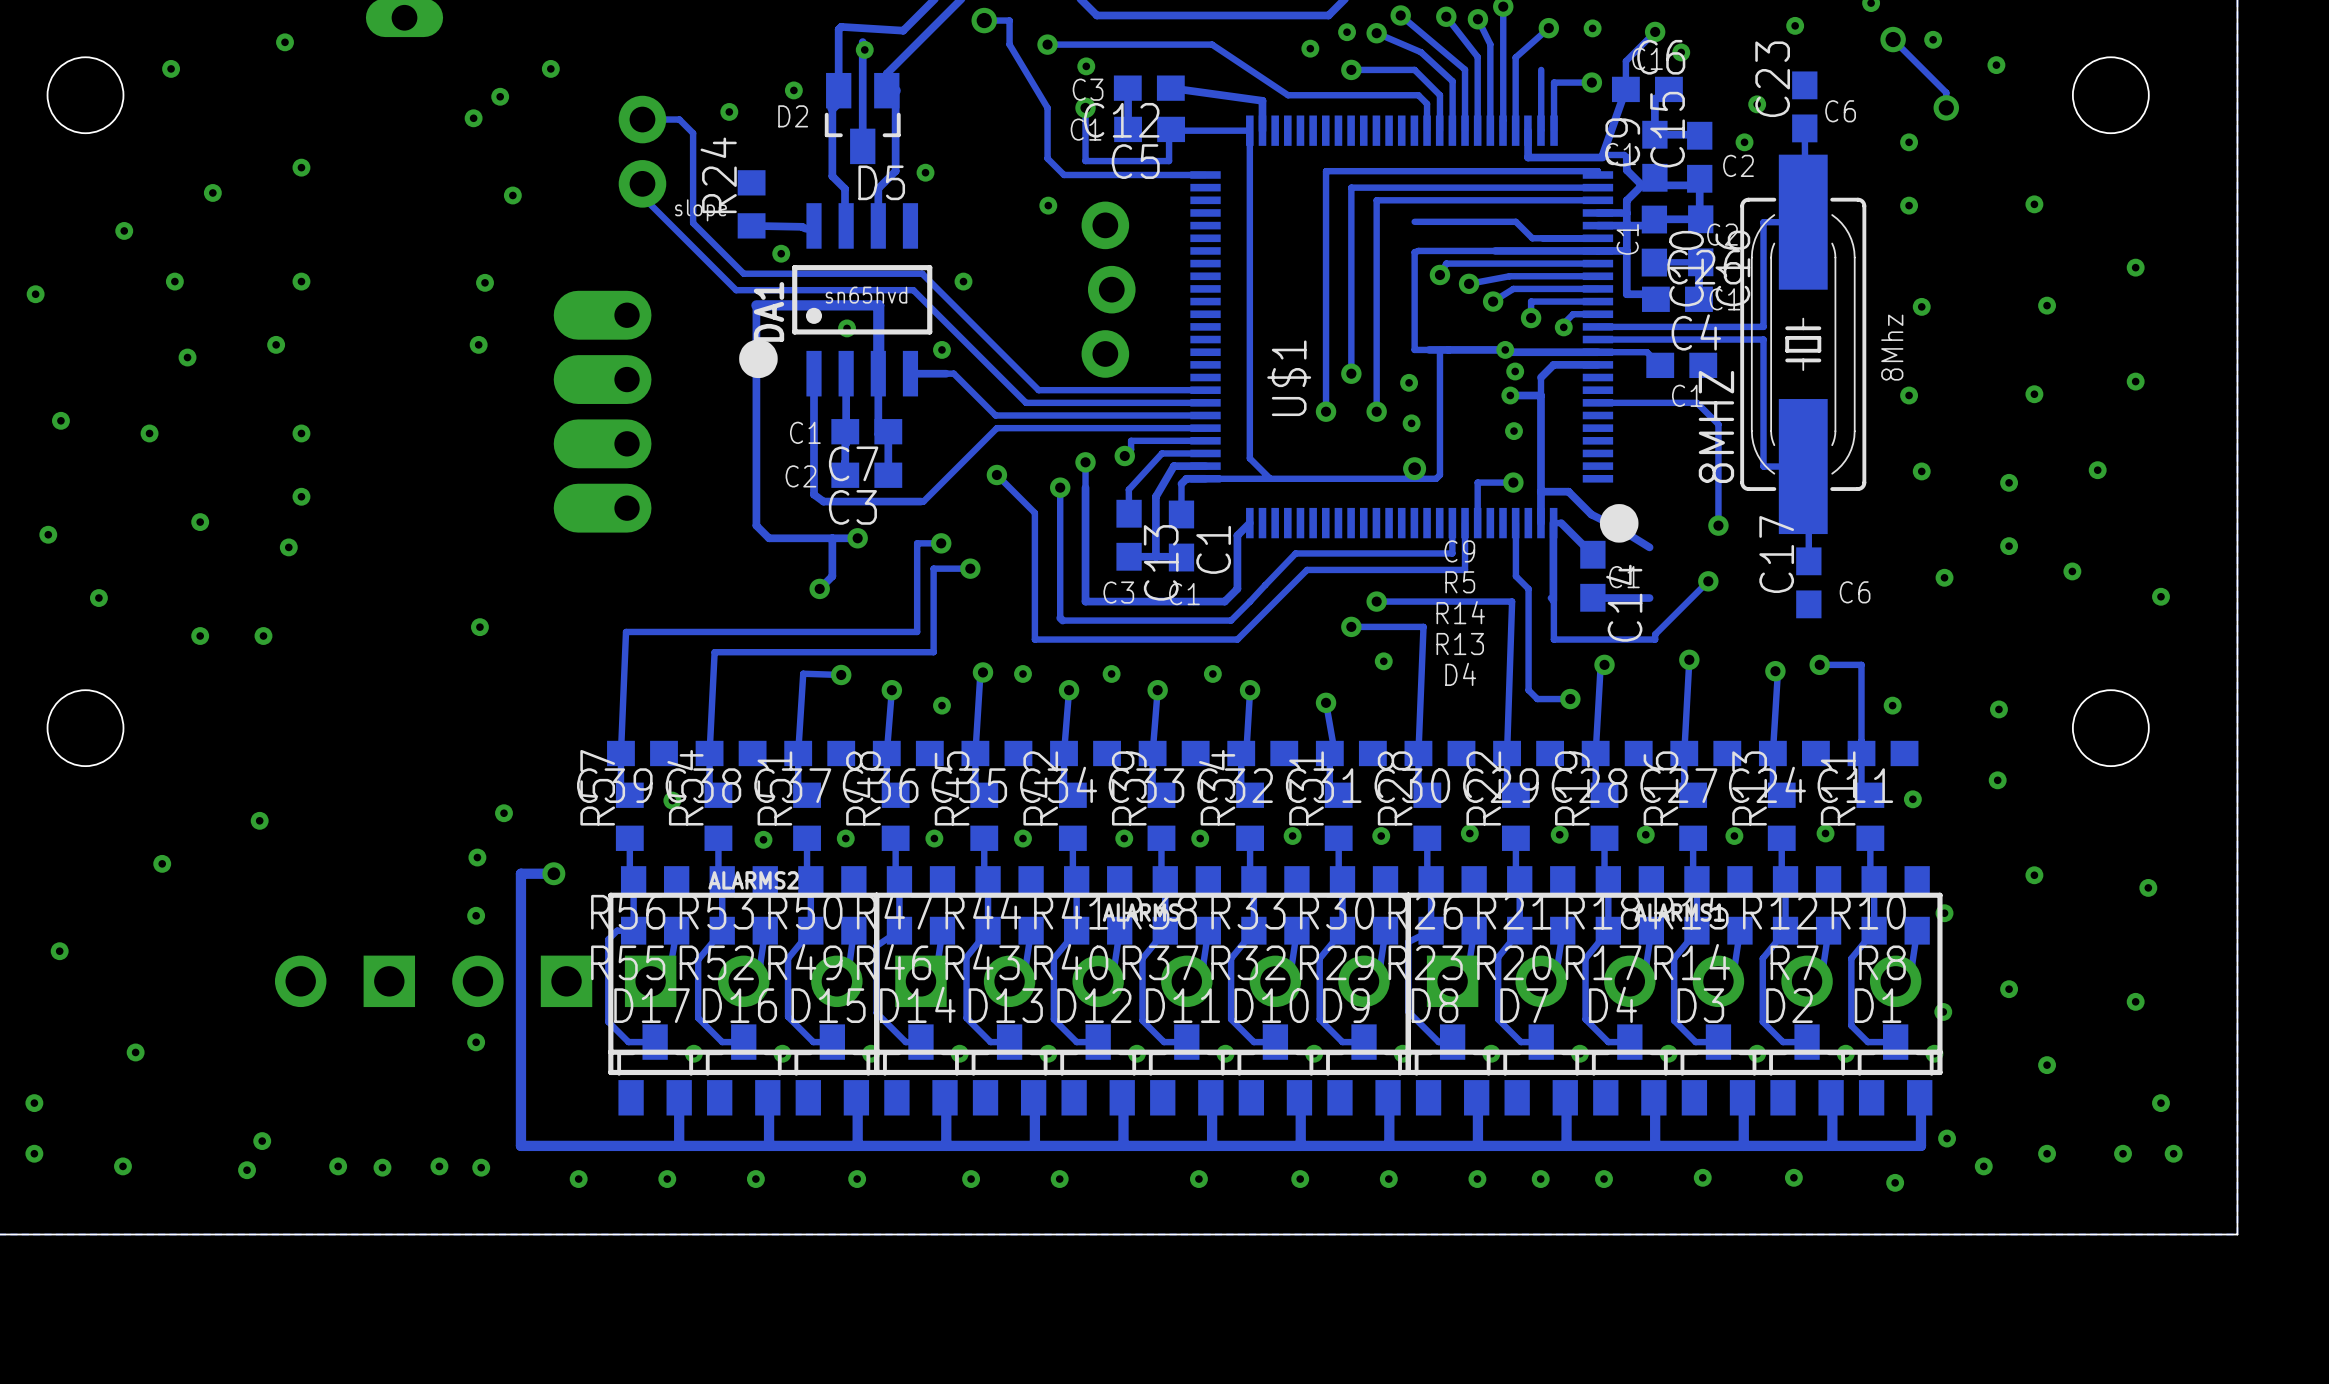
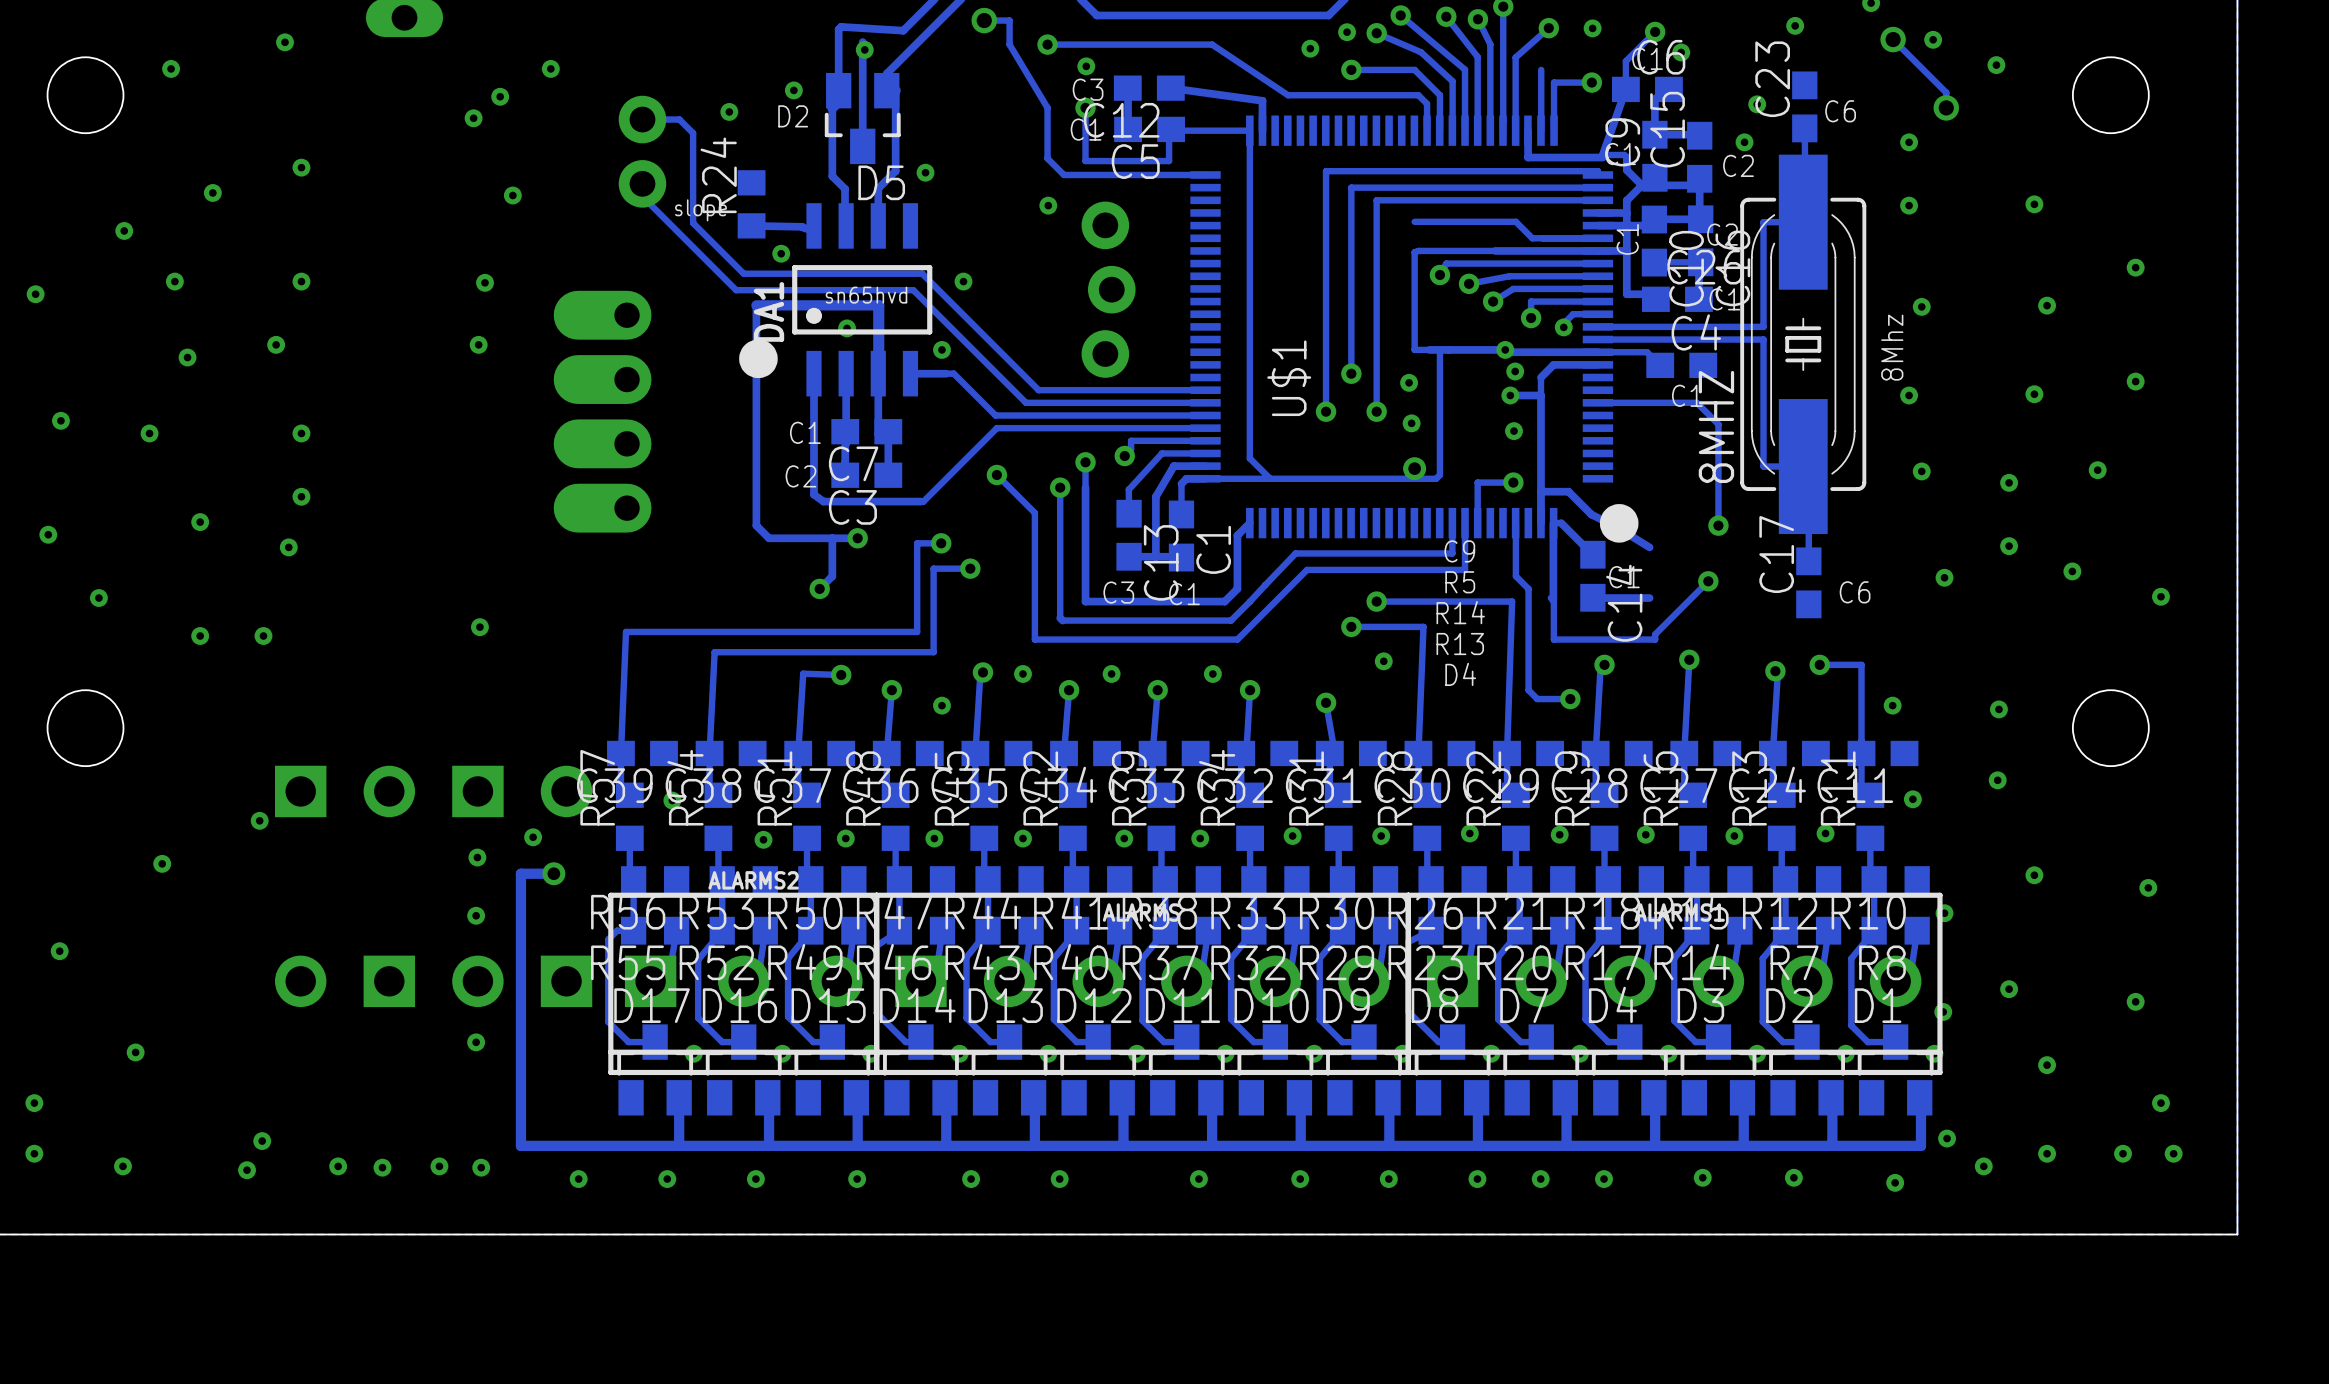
part: none -> (345, 791)
part: none -> (522, 791)
via position: (503, 813) -> (533, 837)

